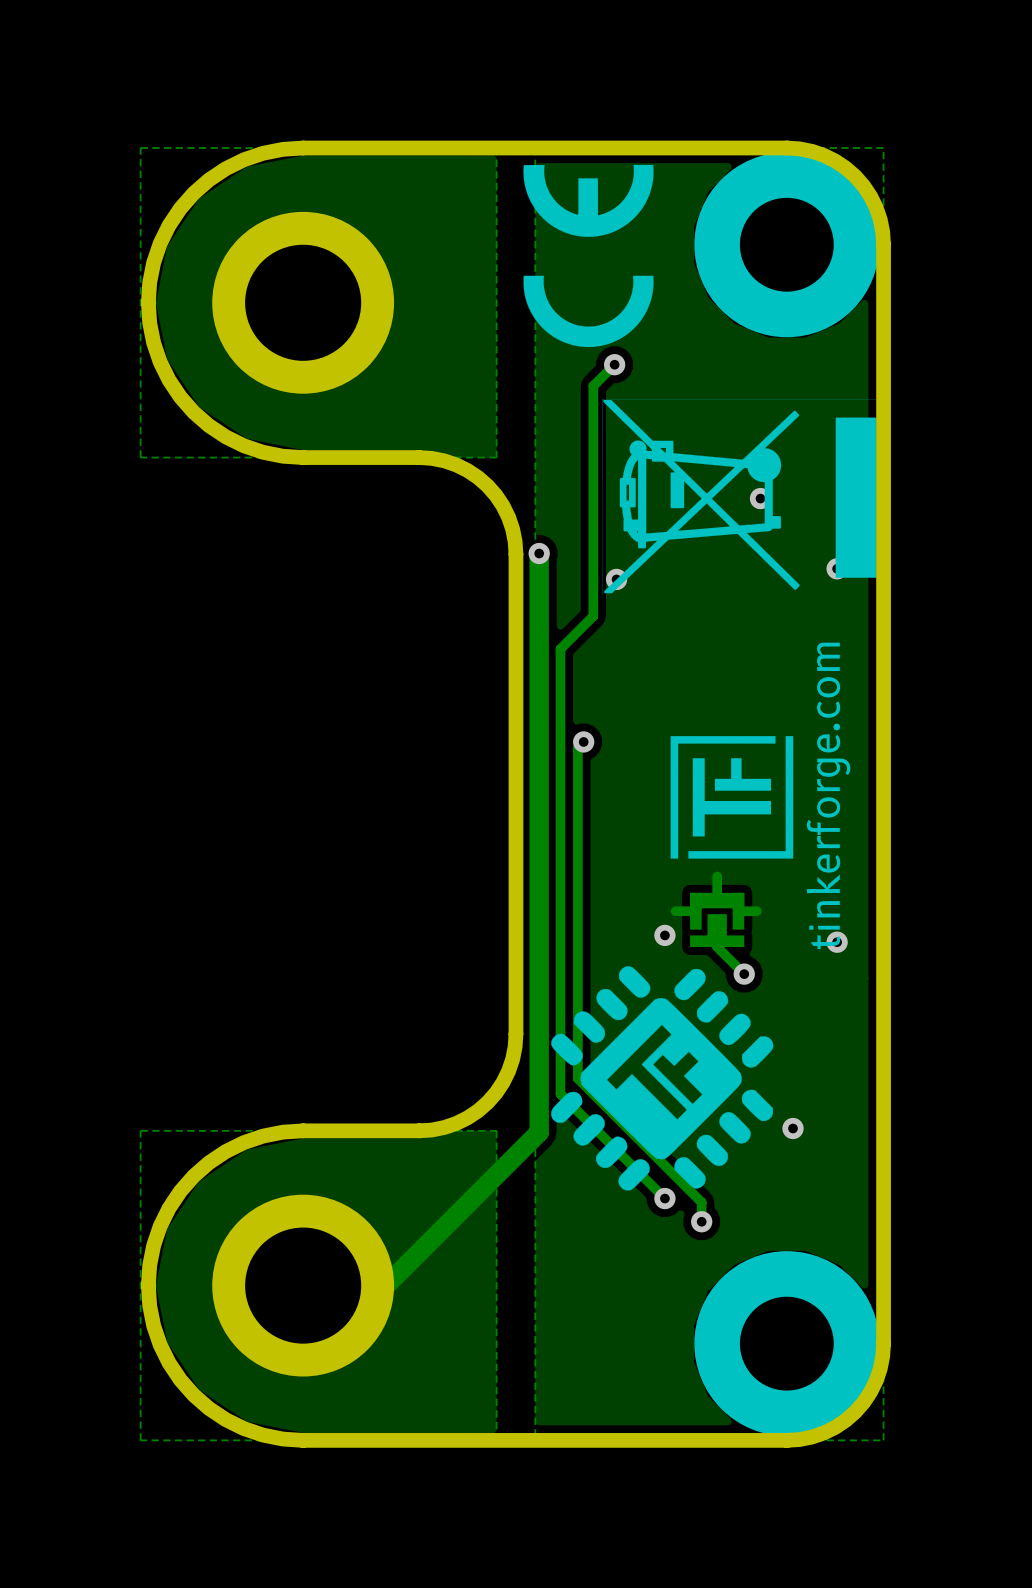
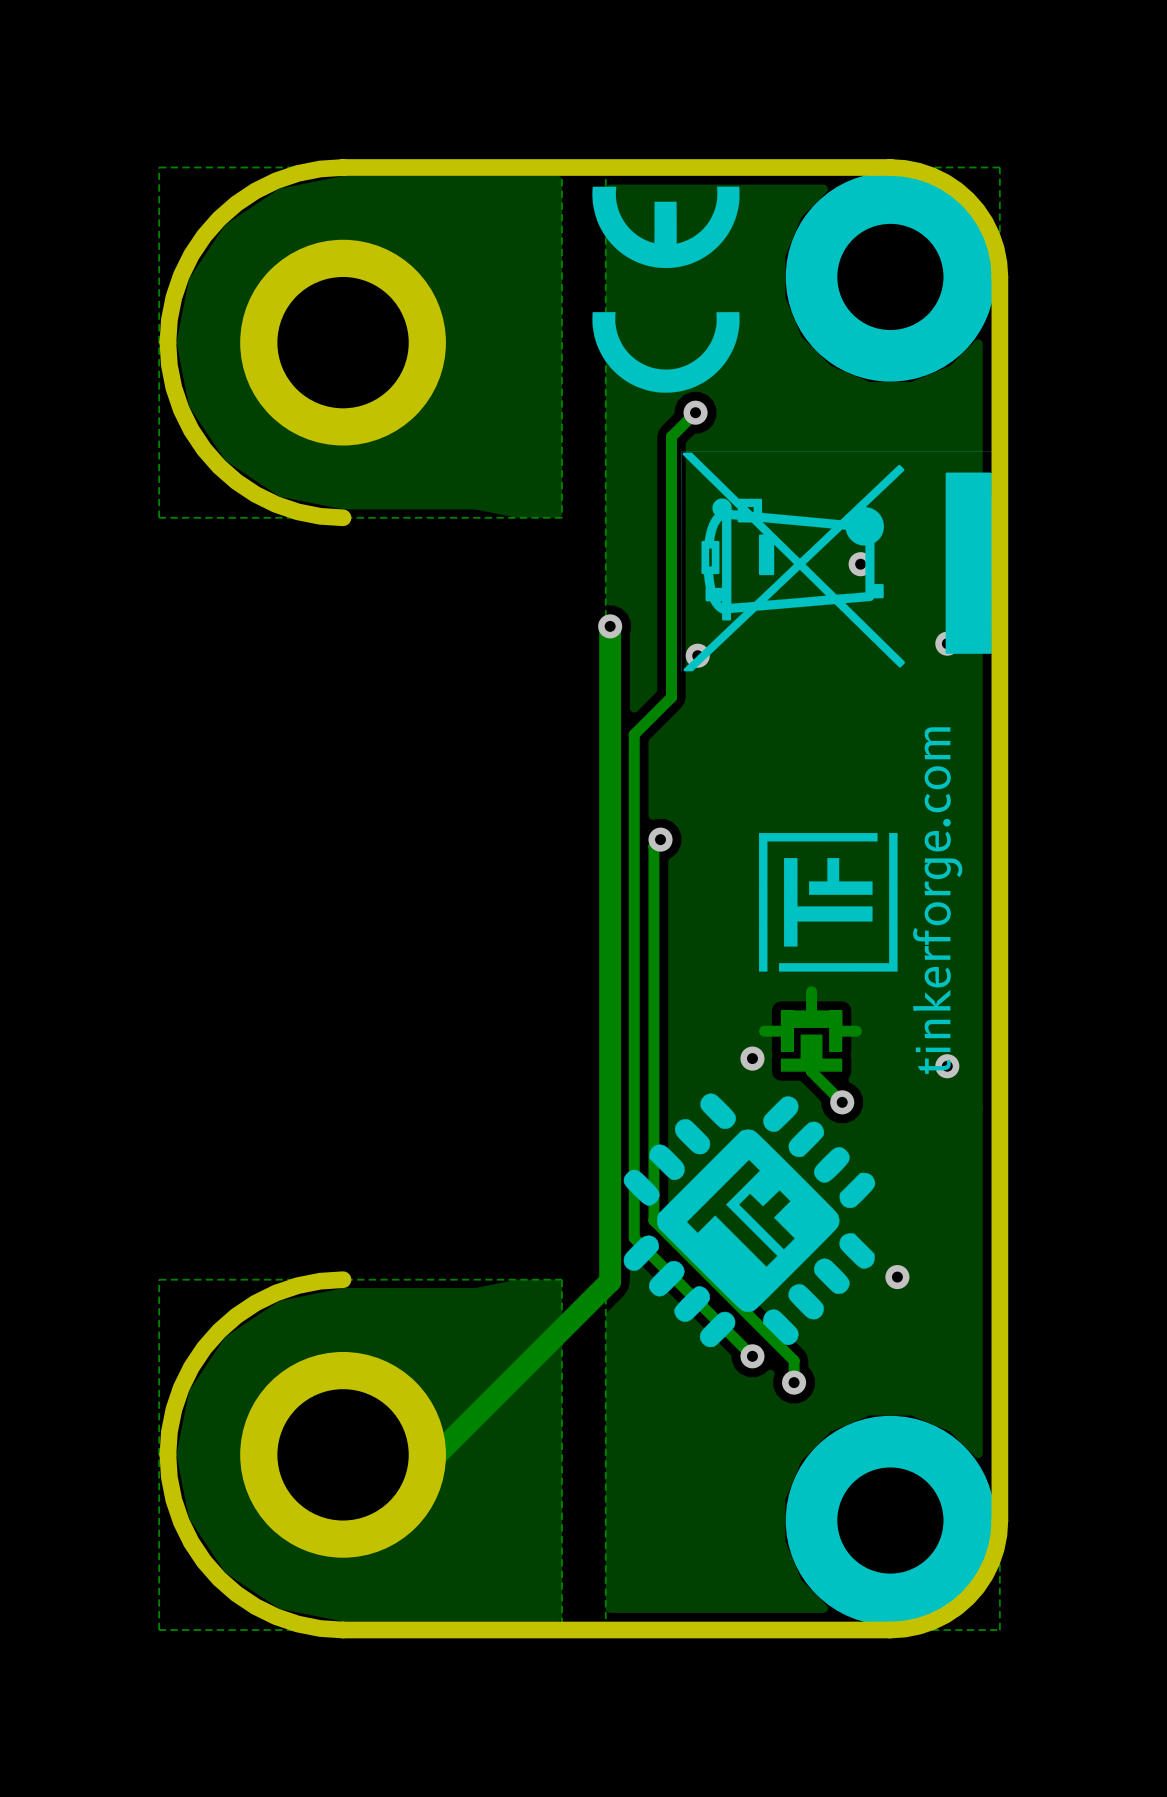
board edge: (303, 457) (419, 457) (431, 458) (456, 464) (478, 477) (495, 495) (508, 517) (512, 529) (515, 554) (515, 1034) (515, 1046) (508, 1071) (495, 1092) (478, 1110) (456, 1123) (444, 1127) (419, 1130) (303, 1130) -> none

